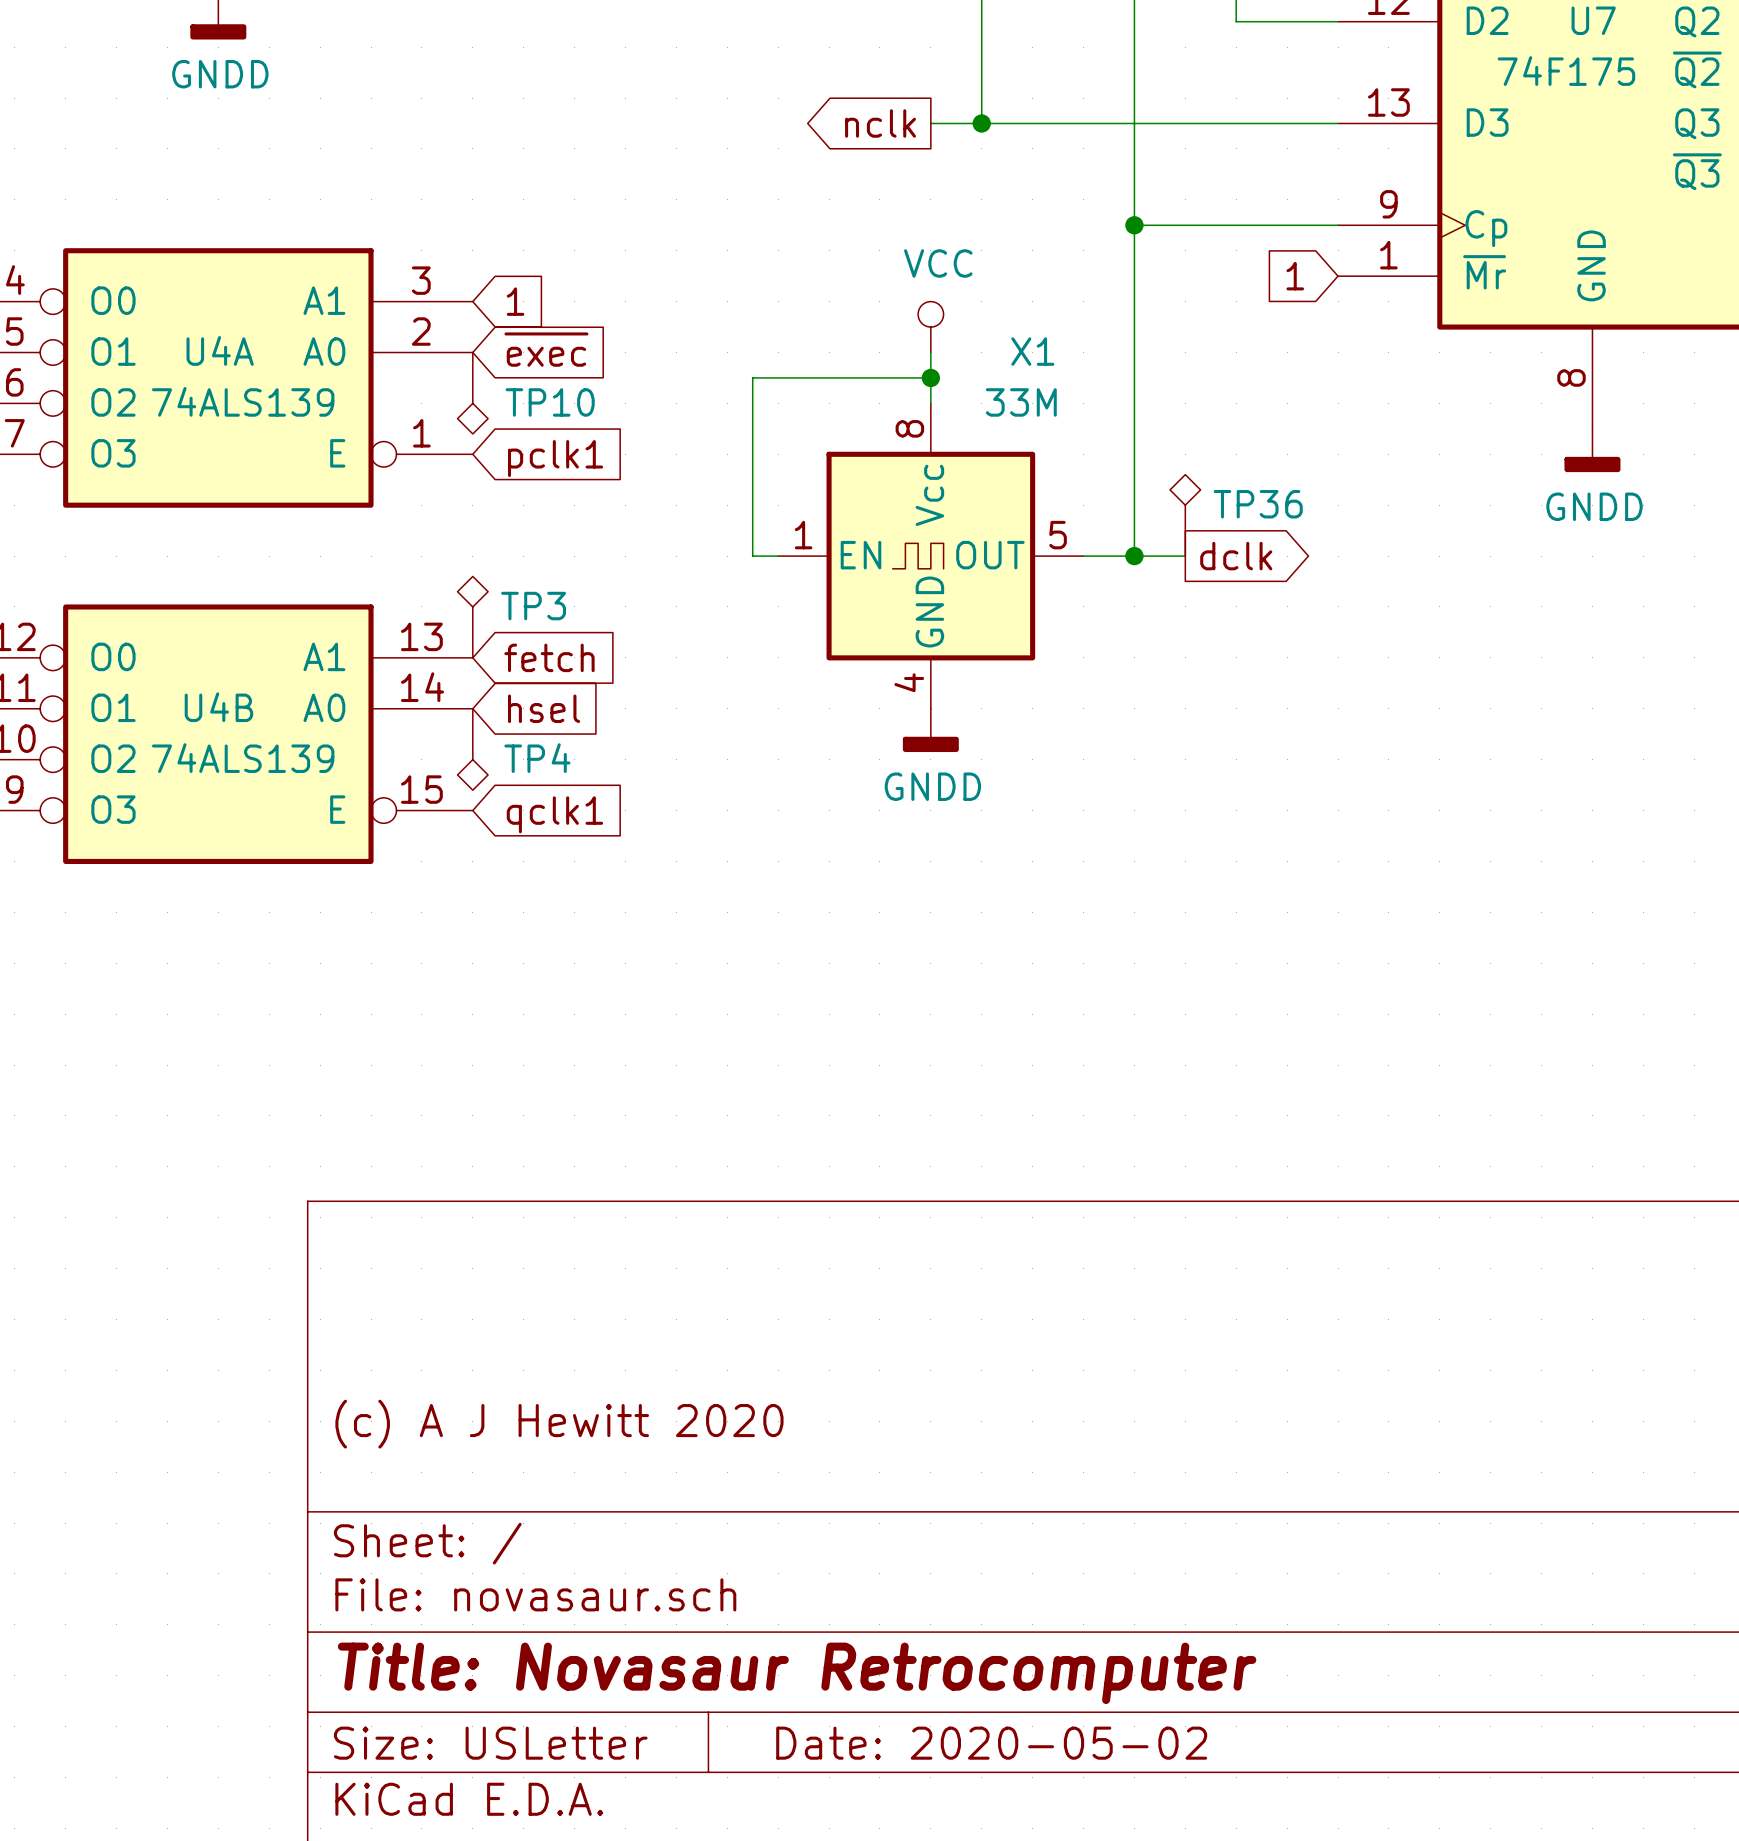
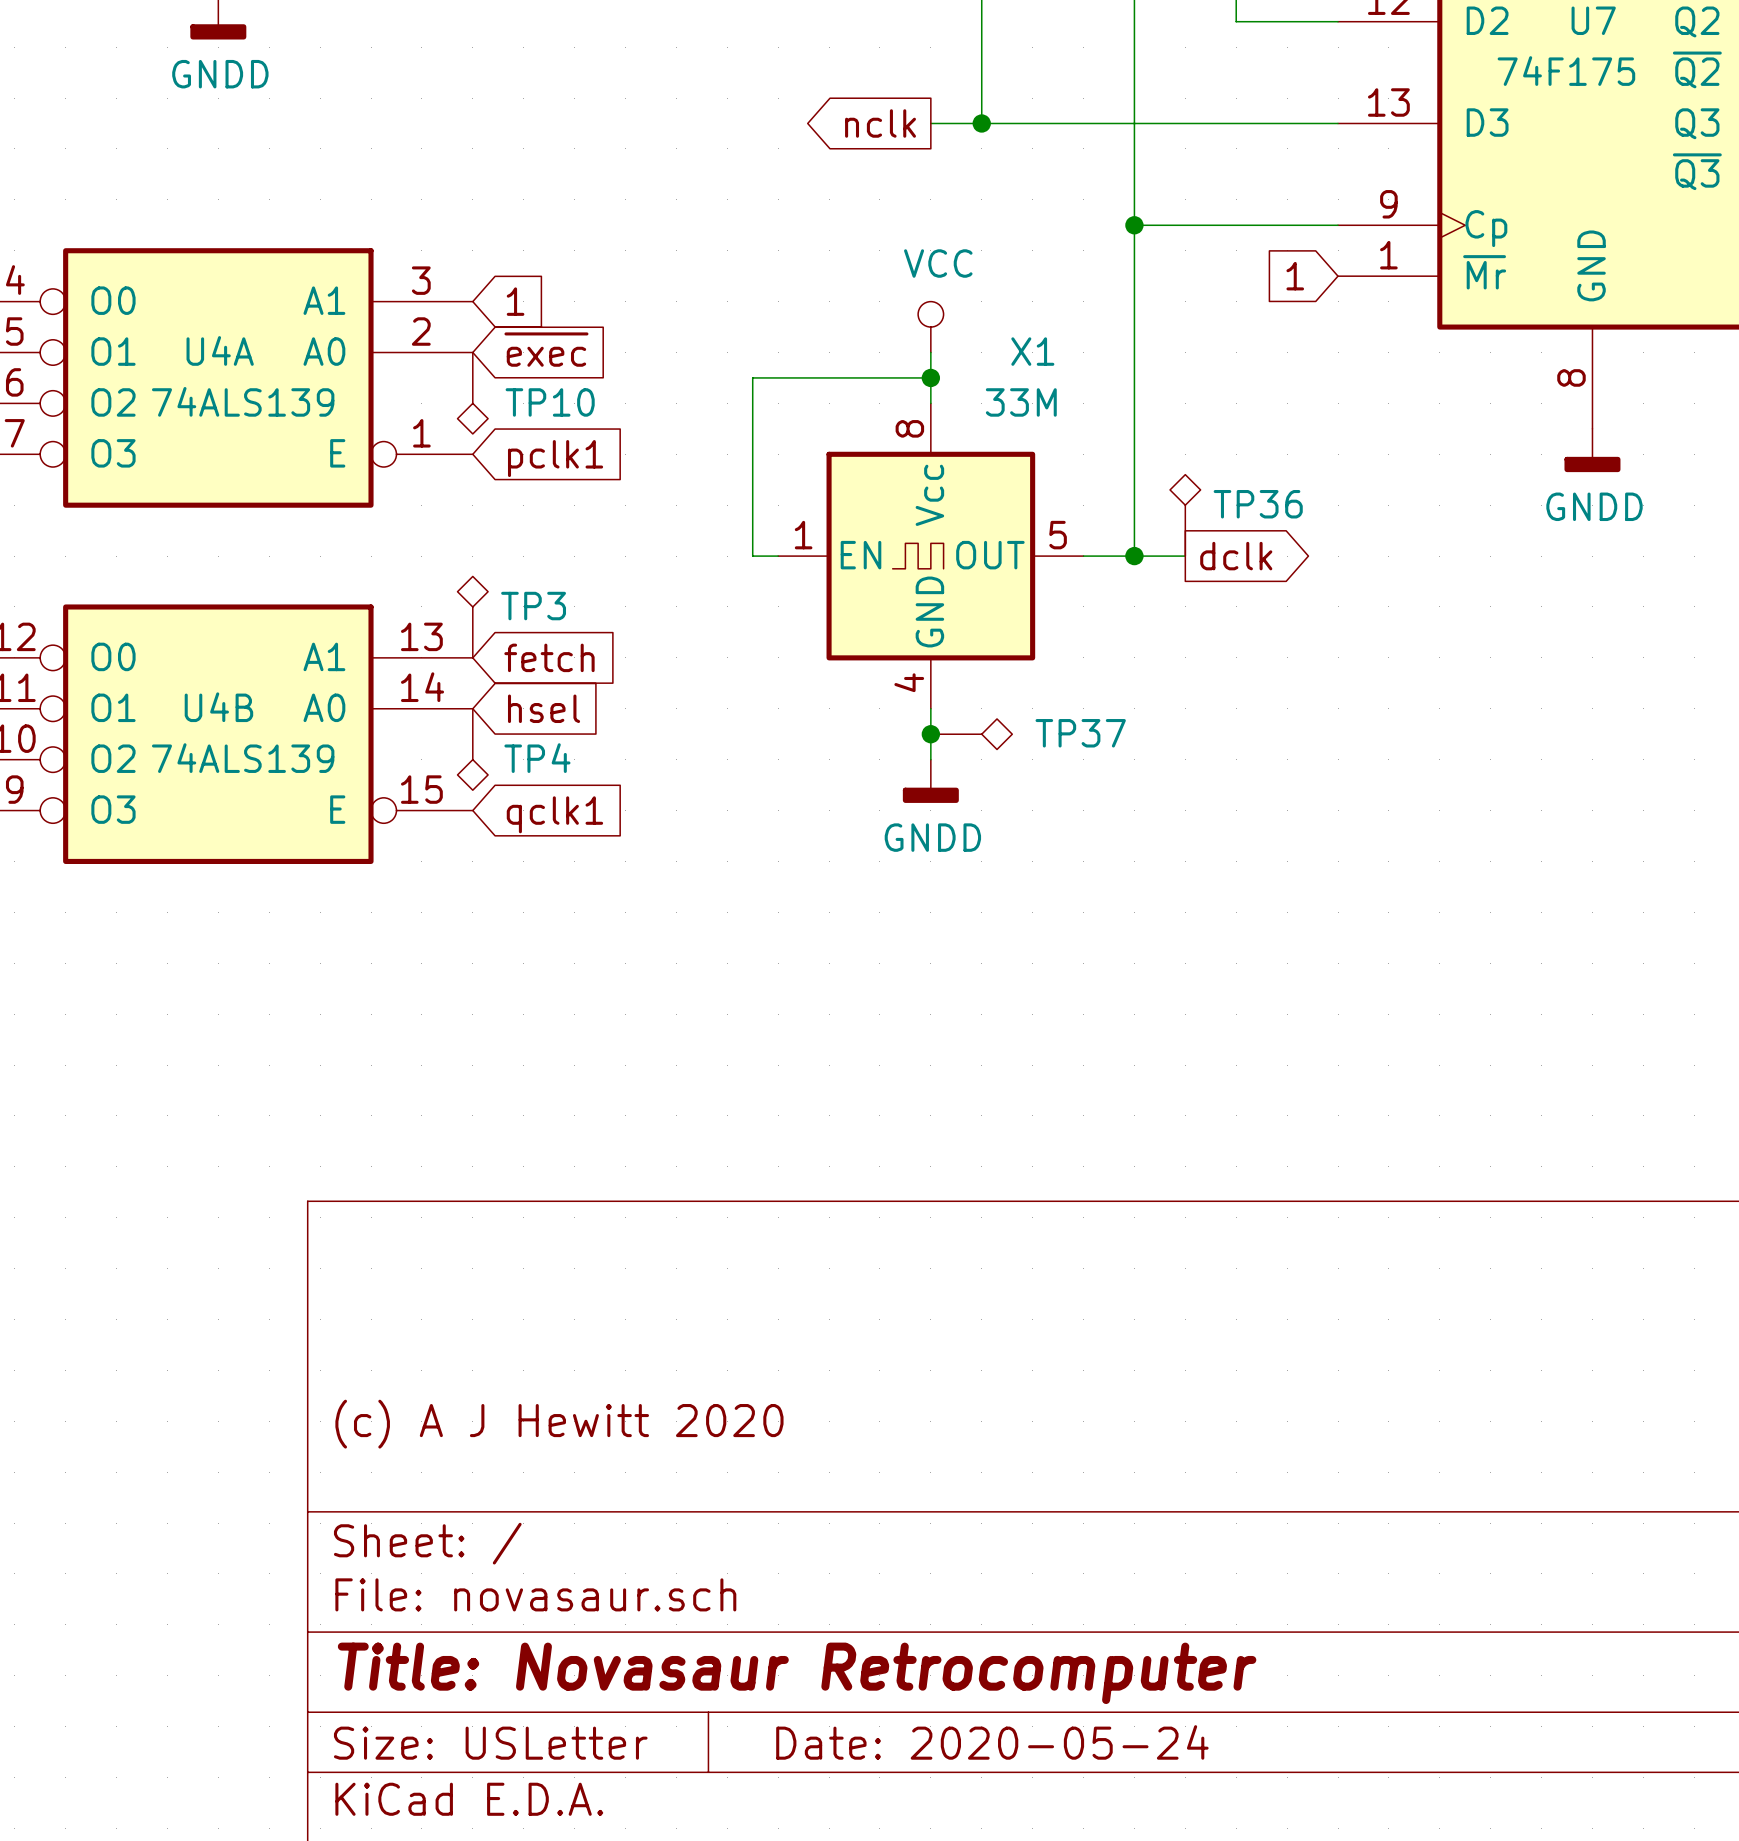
power symbol position: GNDD (930, 730) -> GNDD (930, 781)
junction: none -> (930, 734)
TP37: none -> (971, 734)
title block: Date: 2020-05-02 (991, 1743) -> Date: 2020-05-24 (992, 1742)

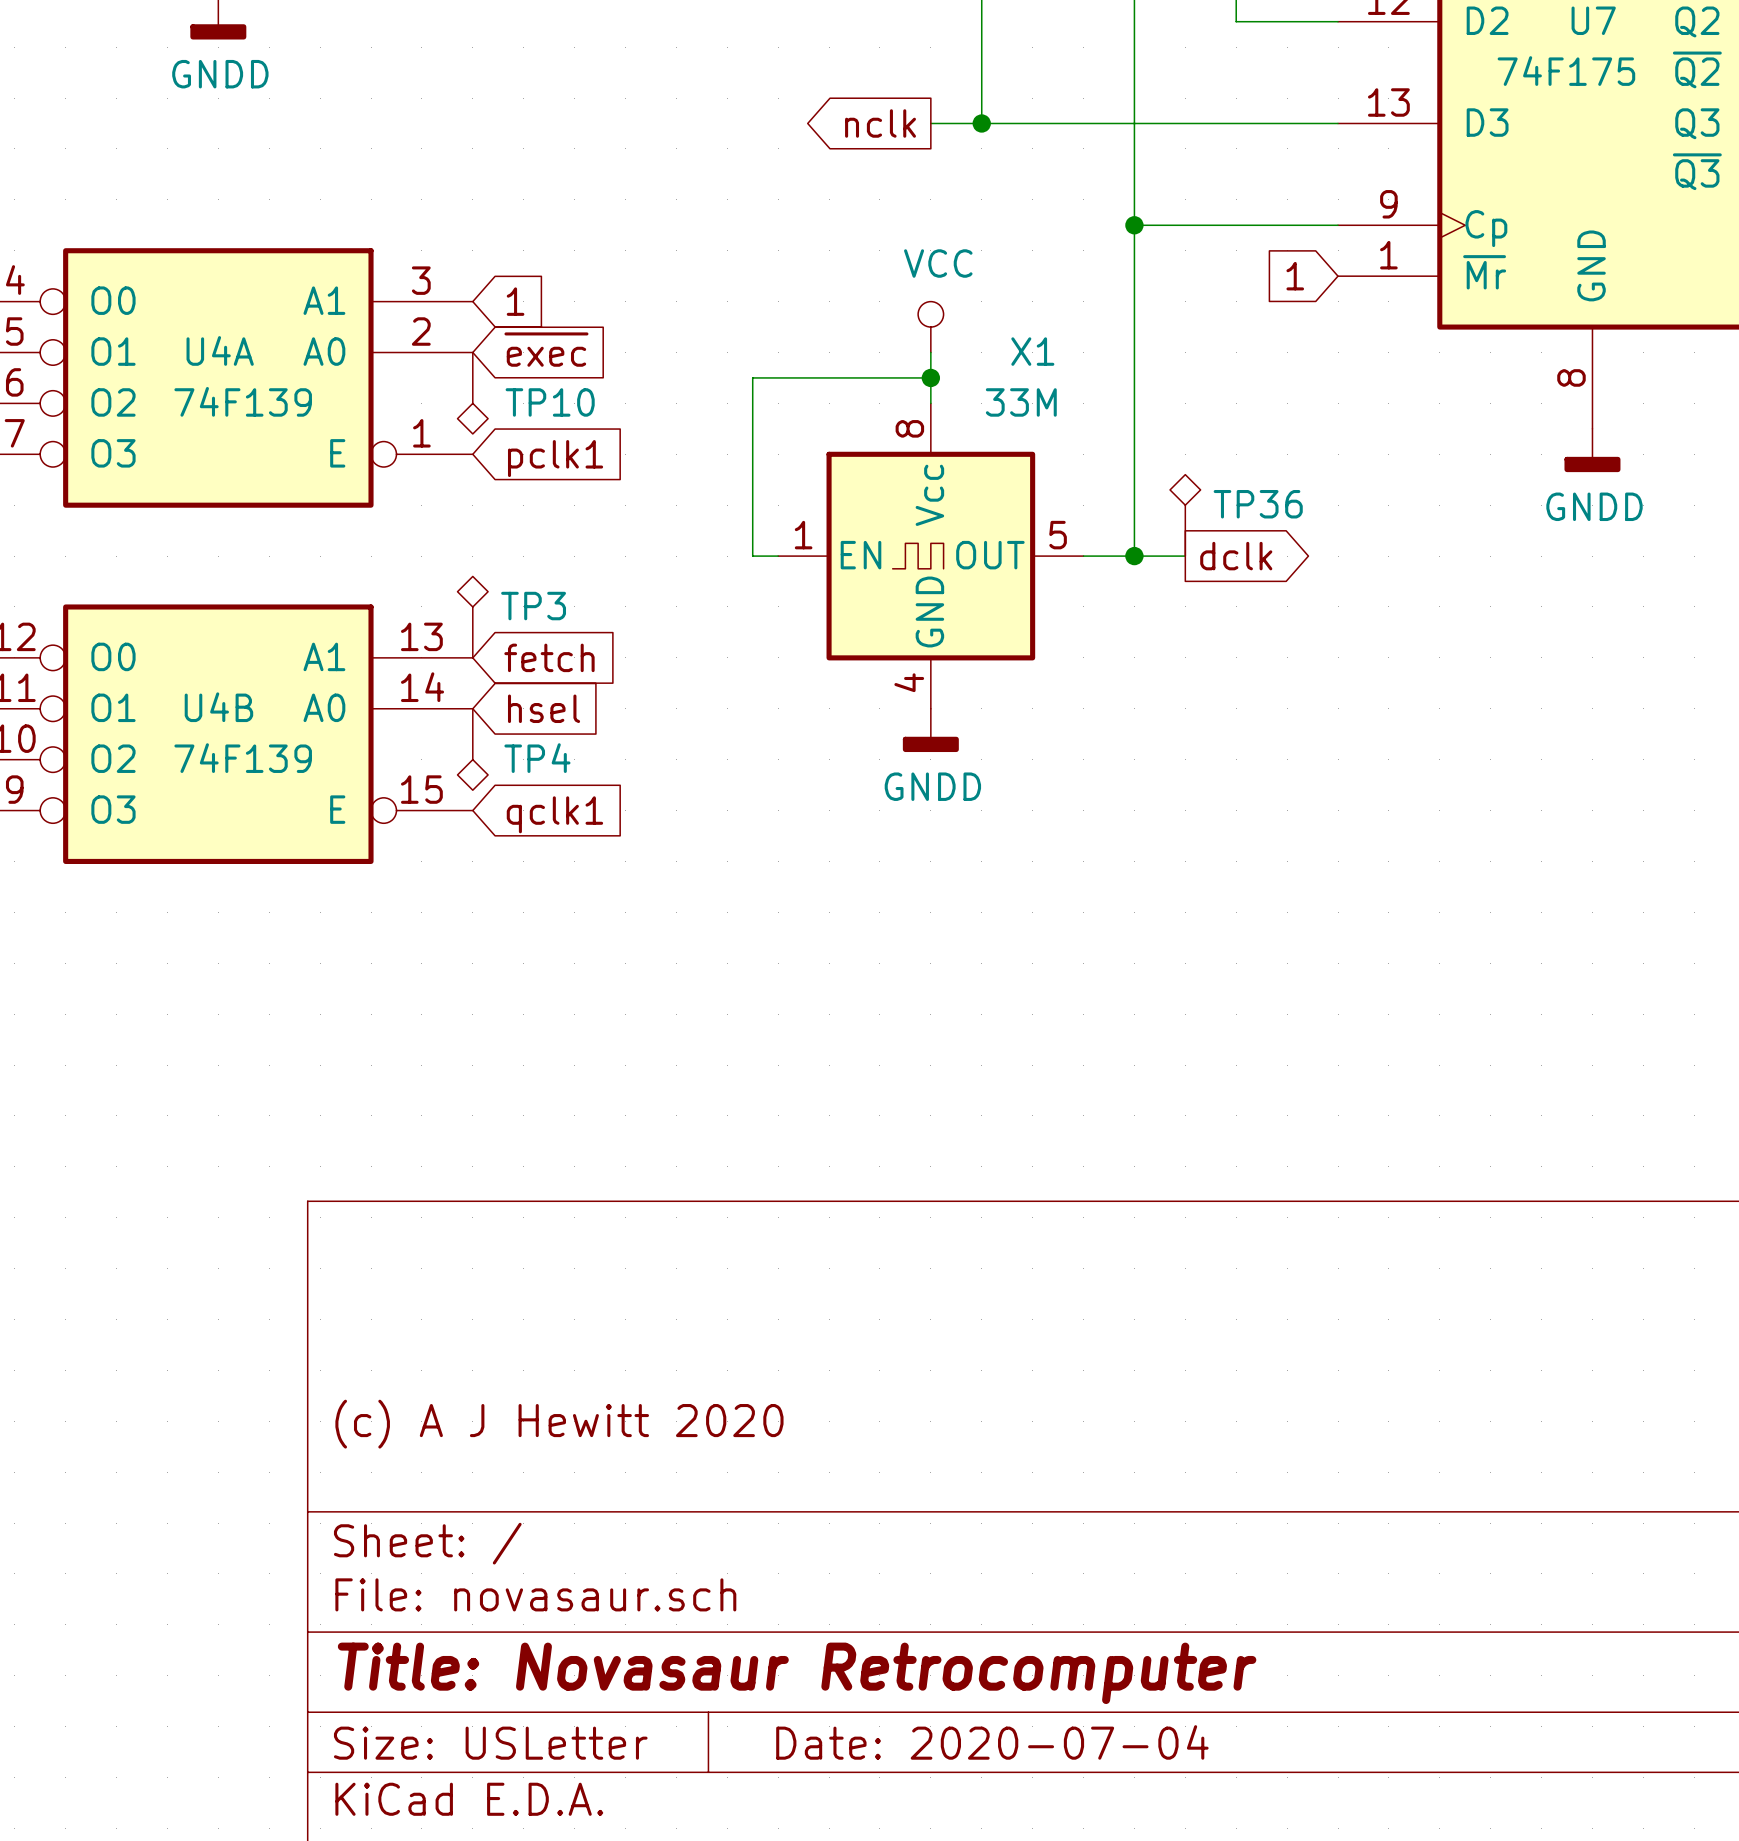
U4A value: 74ALS139 (243, 401) -> 74F139 (243, 401)
junction: (930, 734) -> none
TP37: (971, 734) -> none
U4B value: 74ALS139 (243, 758) -> 74F139 (243, 758)
power symbol position: GNDD (930, 781) -> GNDD (930, 730)
title block: Date: 2020-05-24 (992, 1742) -> Date: 2020-07-04 (992, 1742)

